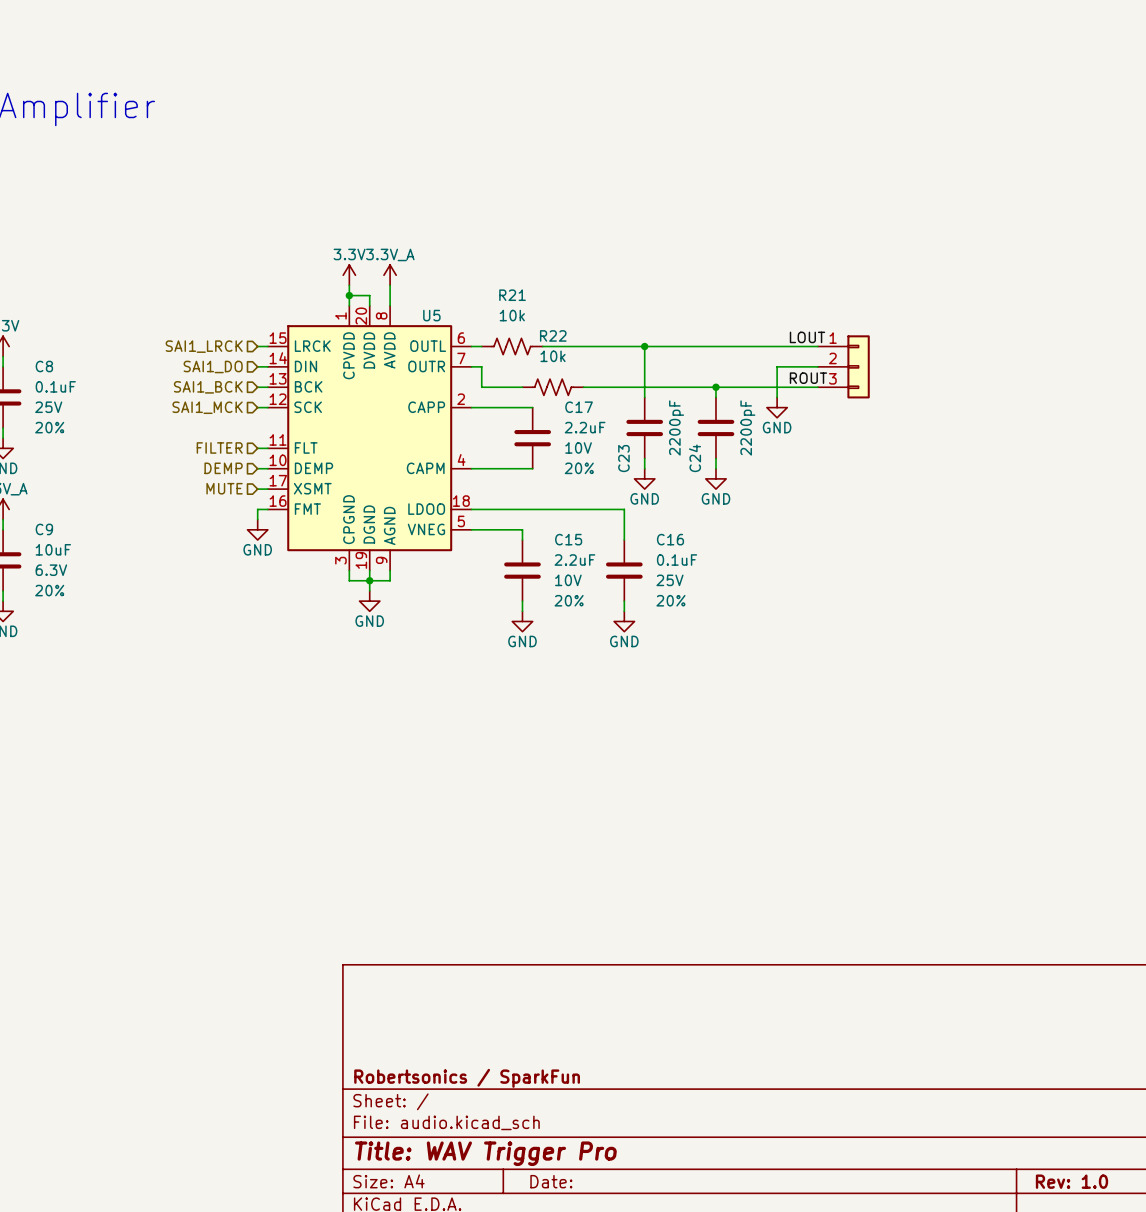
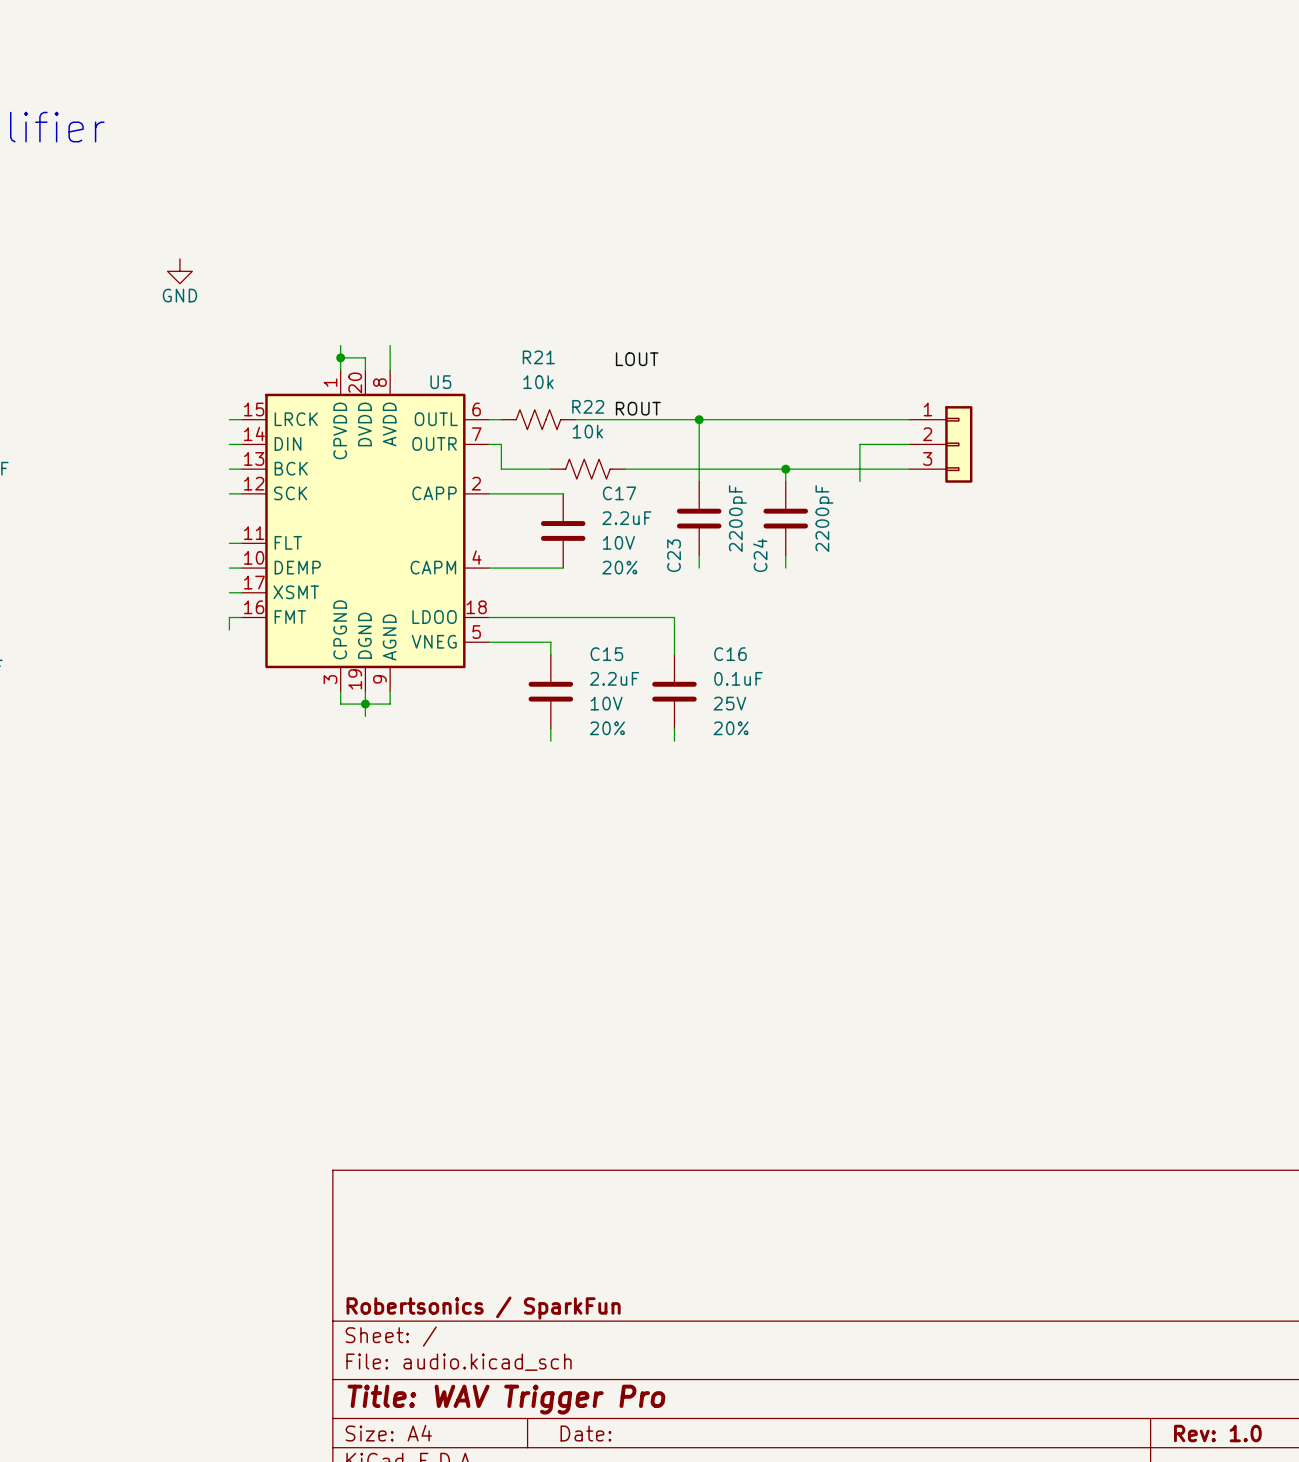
power symbol: none -> GND (179, 271)
power symbol: 3.3V (349, 275) -> none
power symbol: 3.3V_A (390, 275) -> none
label: none -> LOUT (637, 359)
label: none -> ROUT (638, 408)
label: LOUT (807, 337) -> none
hierarchical label: SAI1_LRCK (204, 346) -> none
hierarchical label: SAI1_DO (213, 366) -> none
label: ROUT (808, 378) -> none
hierarchical label: SAI1_BCK (208, 387) -> none
hierarchical label: SAI1_MCK (207, 407) -> none
power symbol: GND (777, 407) -> none
hierarchical label: FILTER (219, 447) -> none
hierarchical label: DEMP (223, 468) -> none
power symbol: GND (644, 478) -> none
power symbol: GND (715, 478) -> none
hierarchical label: MUTE (224, 488) -> none
power symbol: GND (257, 529) -> none
power symbol: GND (369, 601) -> none
power symbol: GND (522, 621) -> none
power symbol: GND (624, 621) -> none

